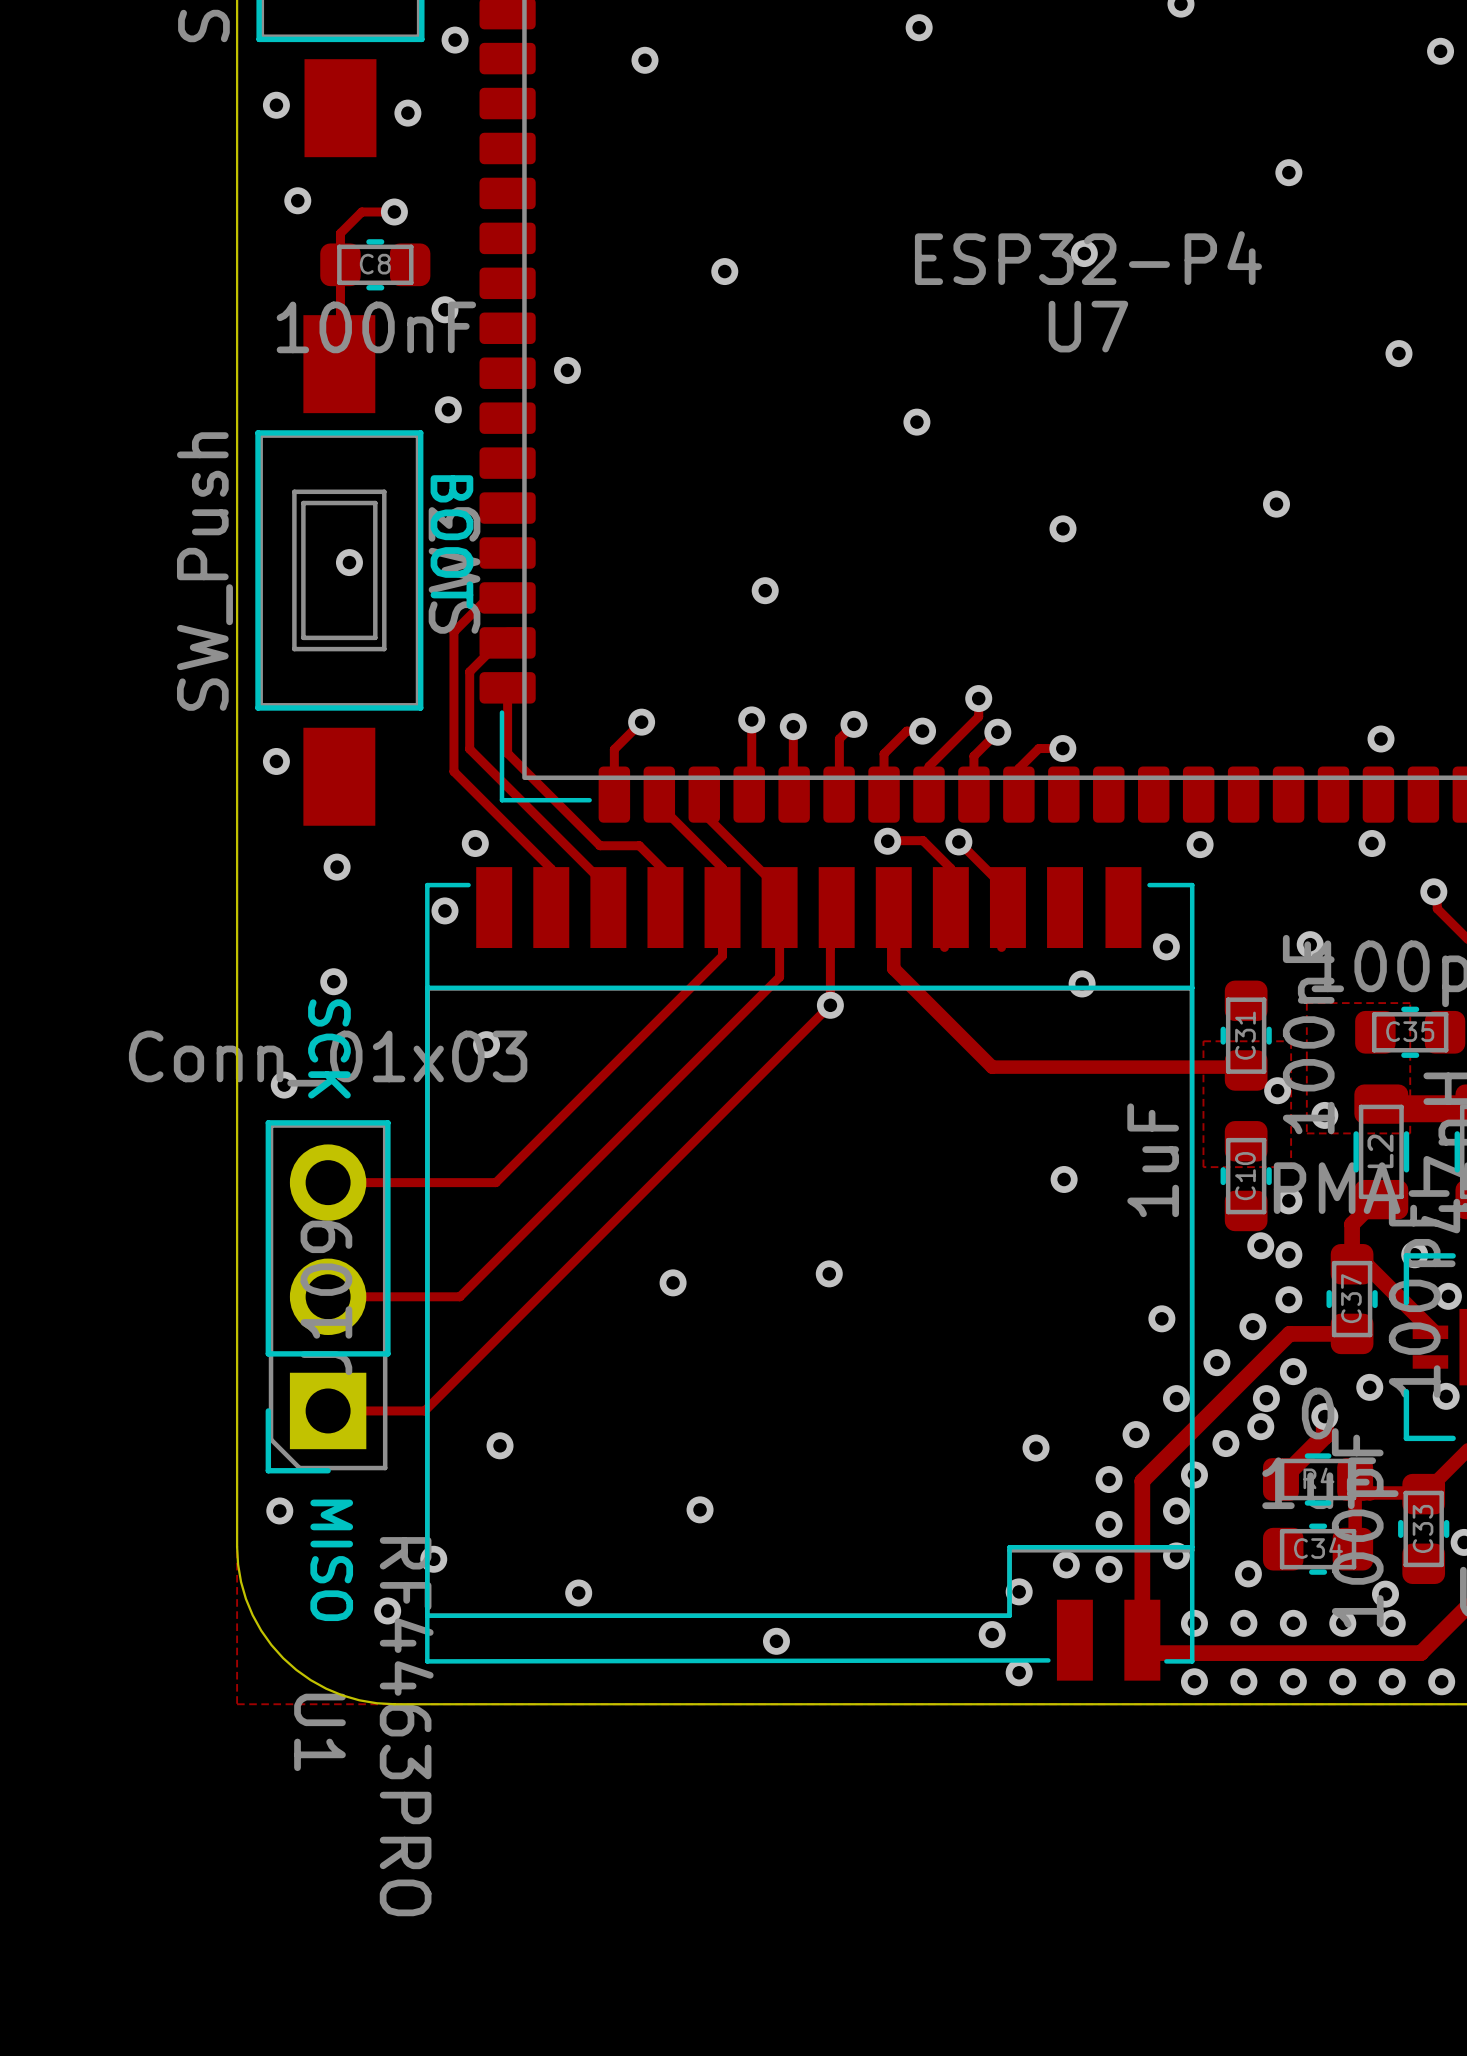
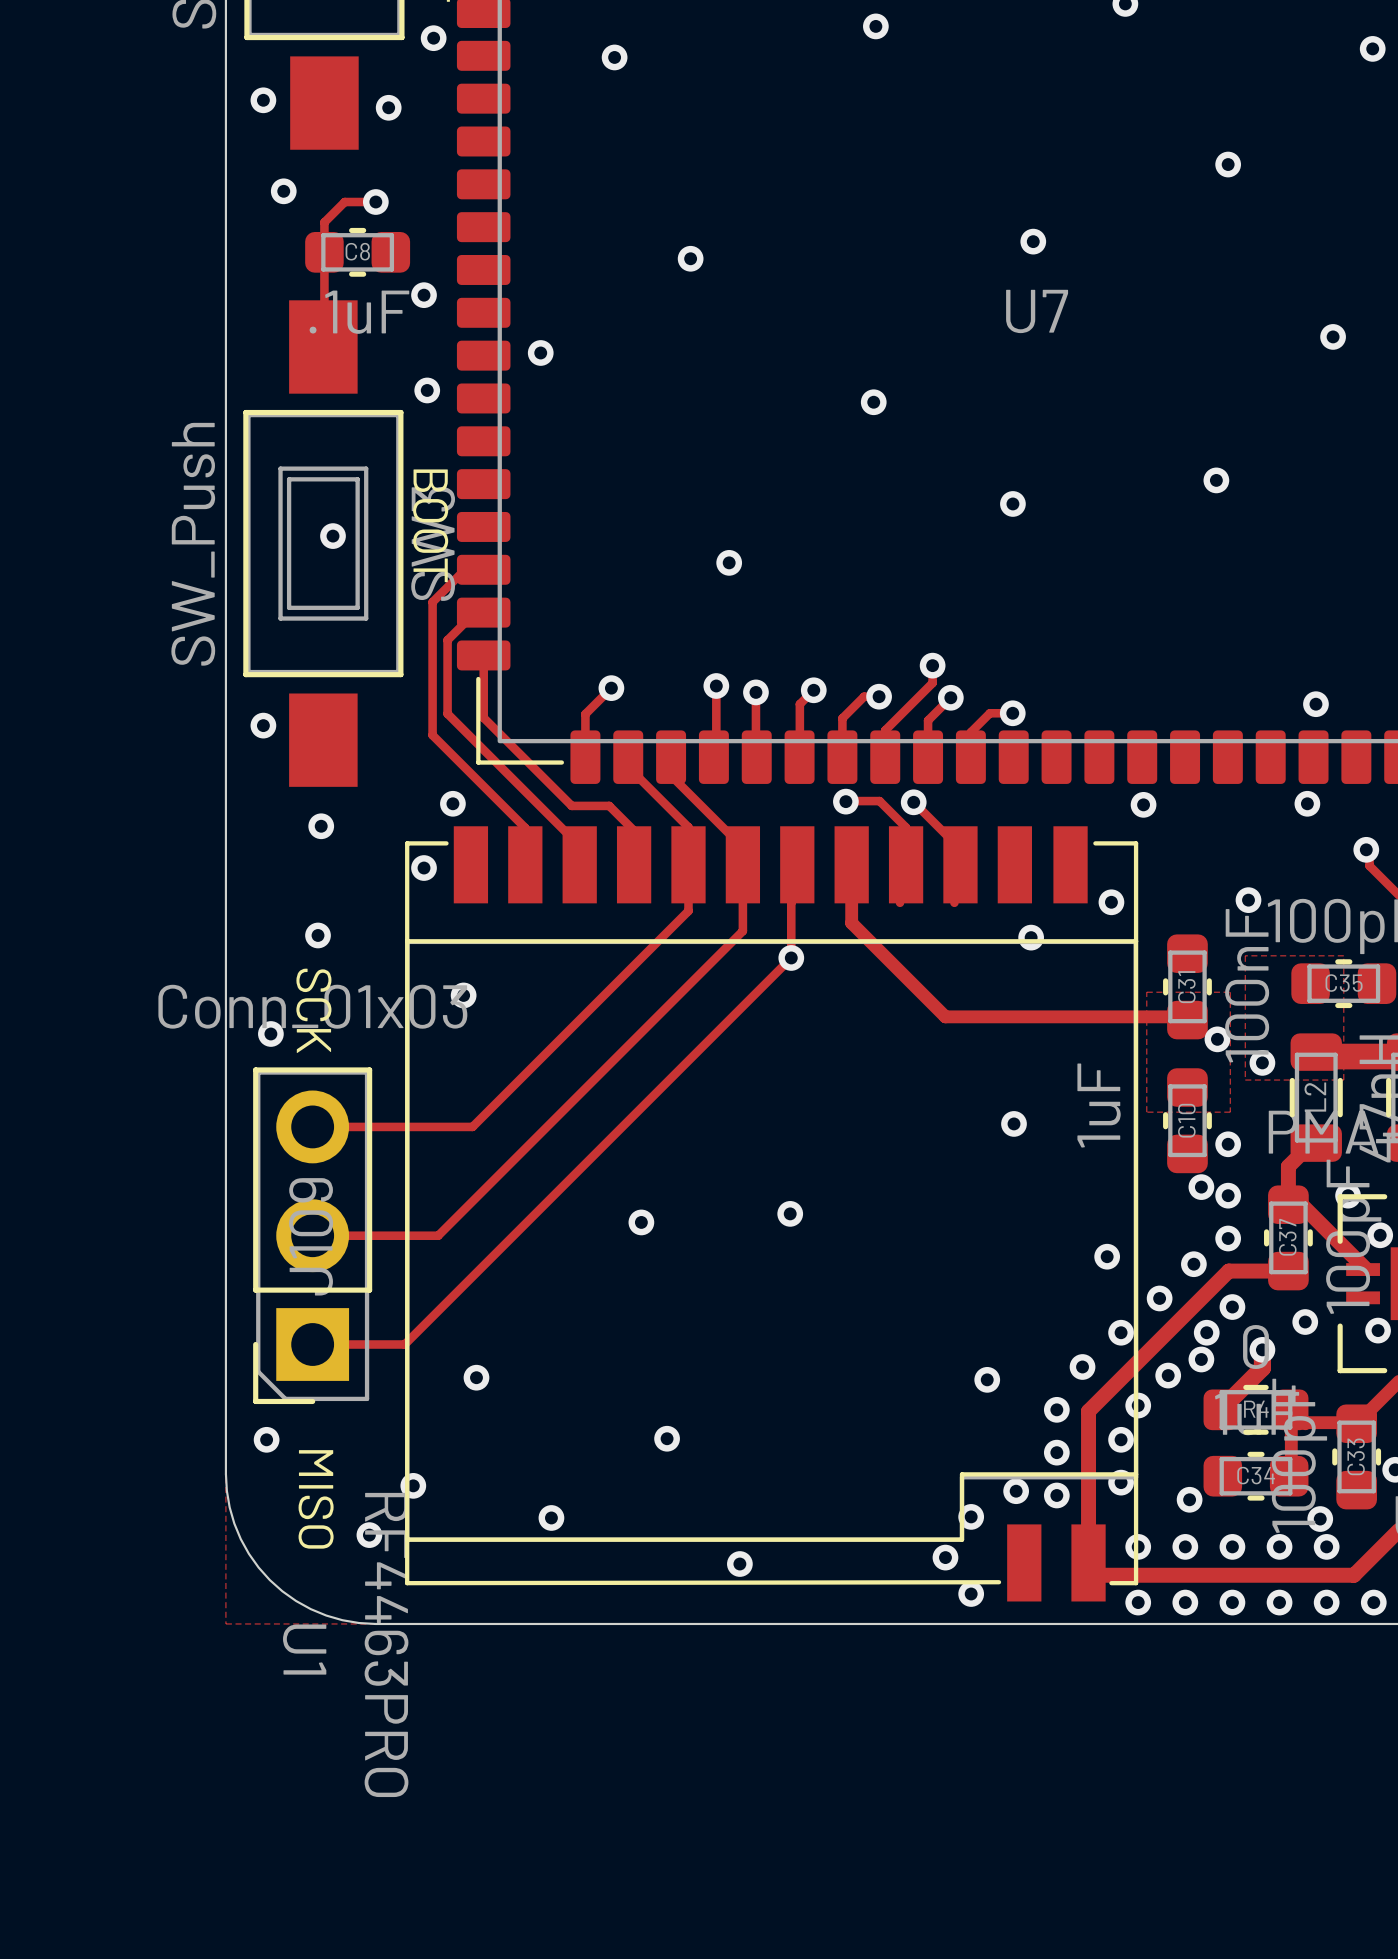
U7 value: ESP32-P4 (1088, 258) -> none
C8 value: 100nF (376, 327) -> .1uF (359, 312)

